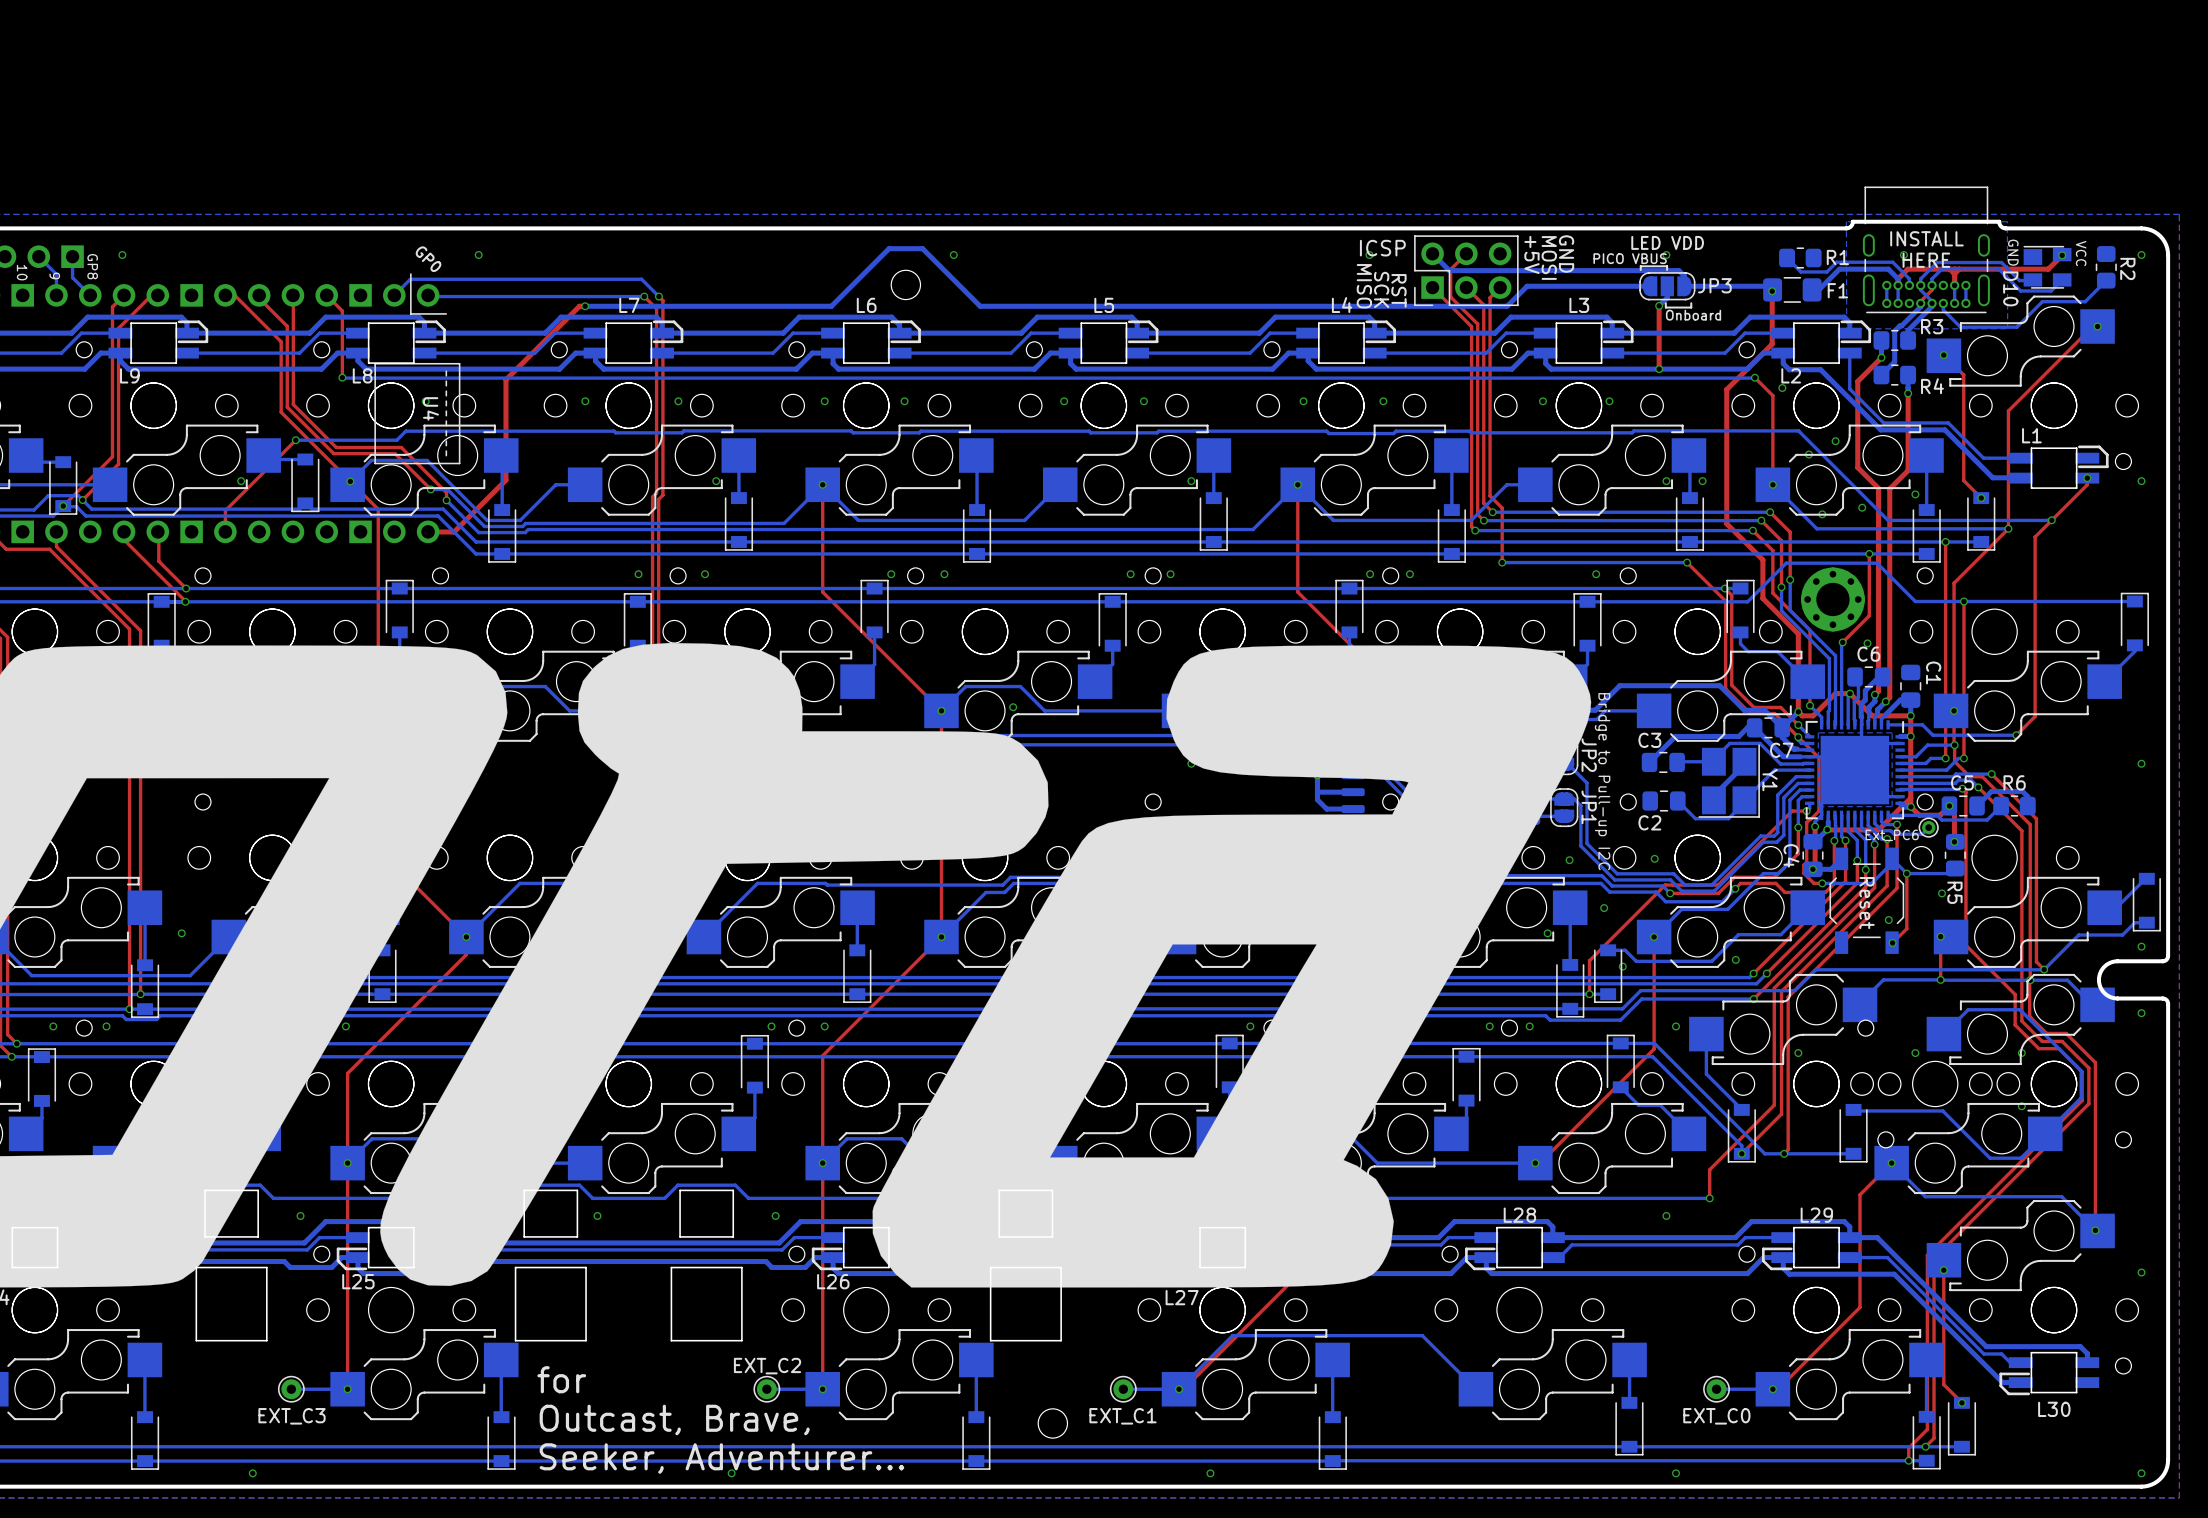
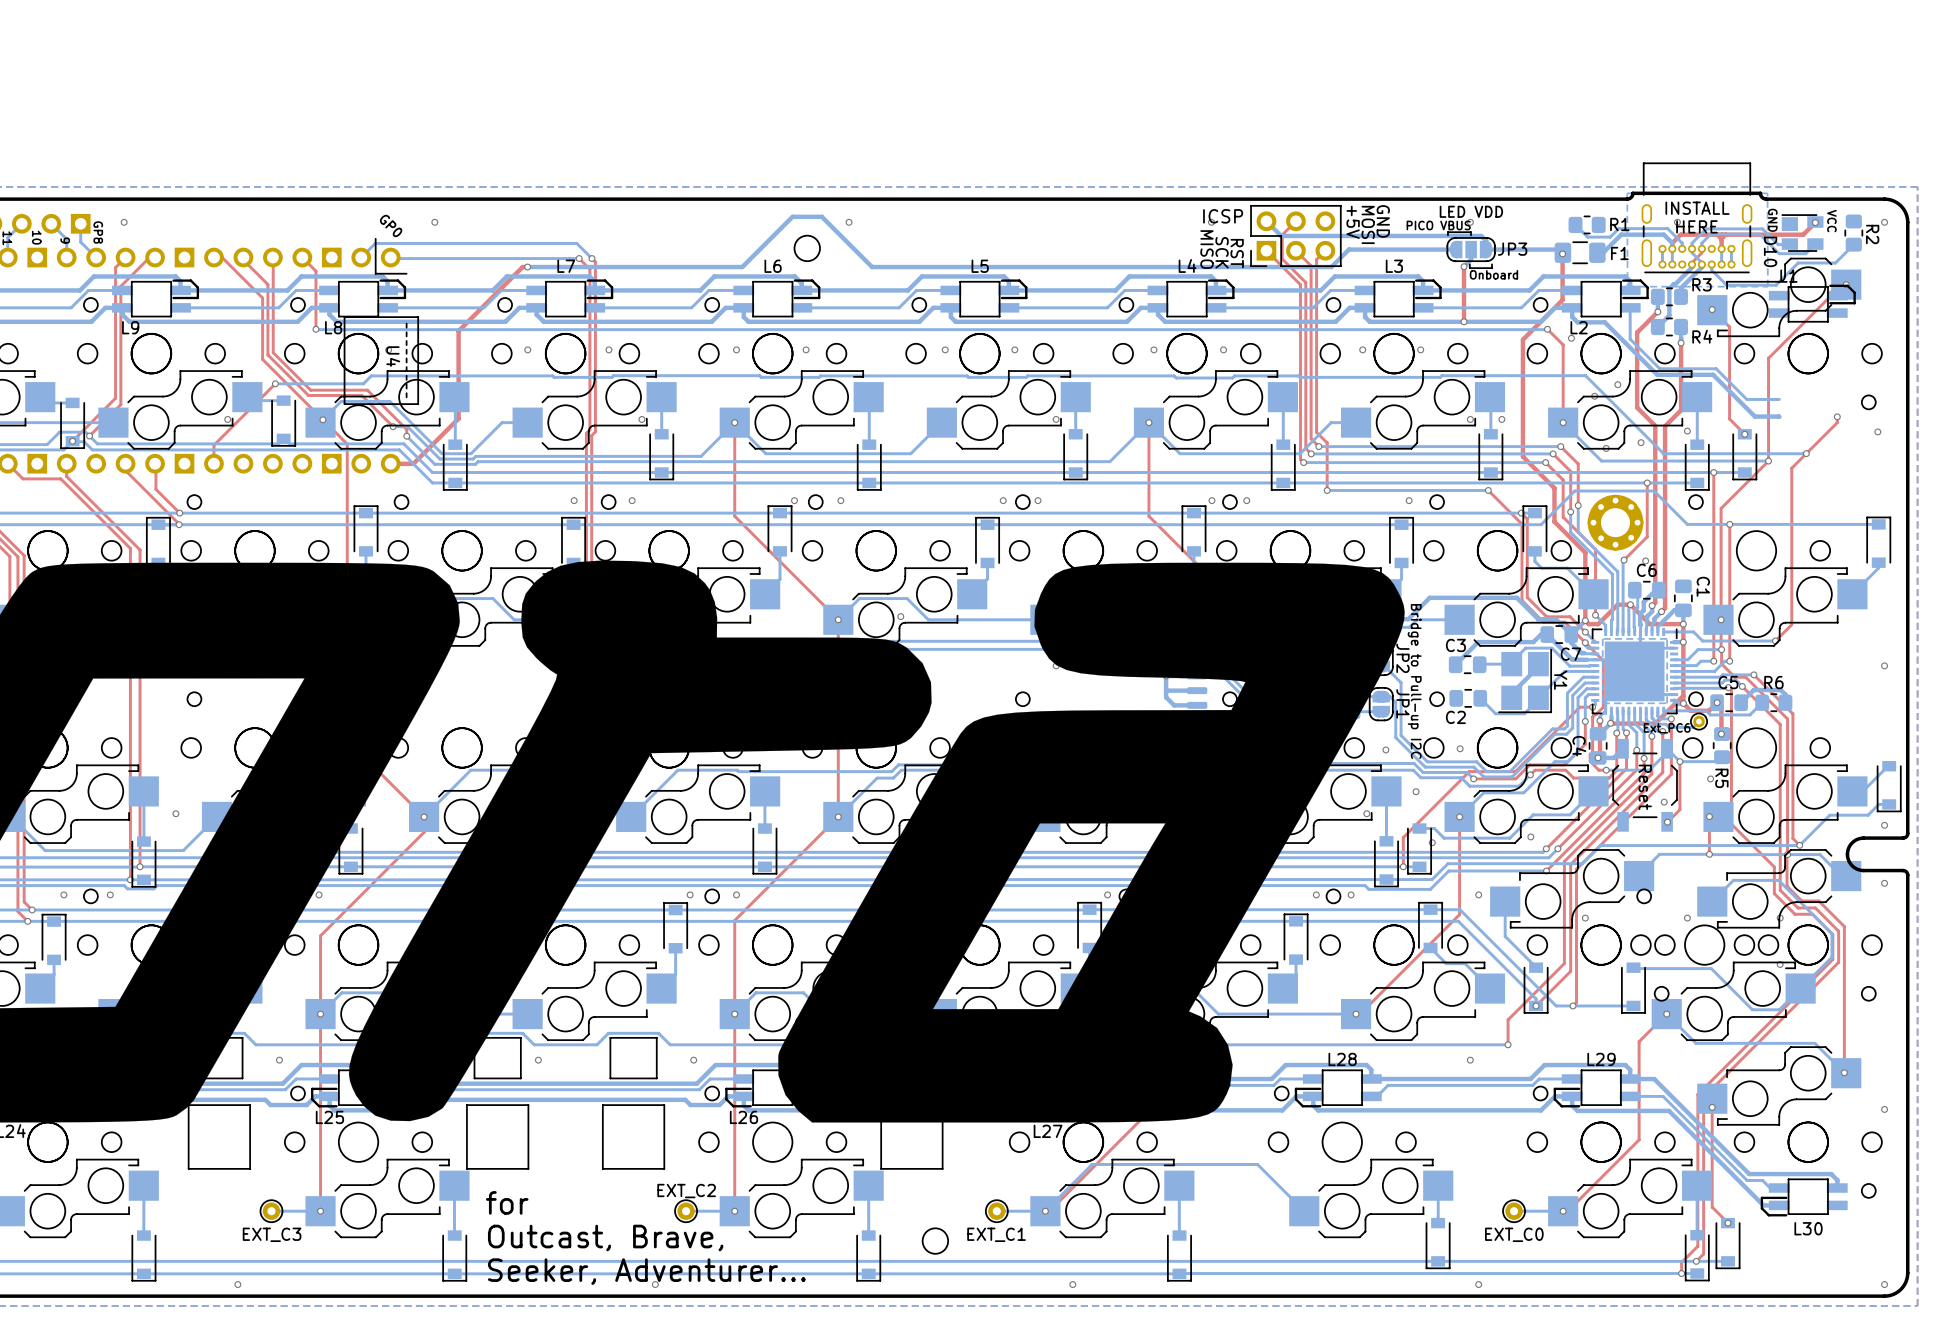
L1 position: (2058, 467) -> (1812, 303)
via position: (2141, 481) -> (1877, 431)

